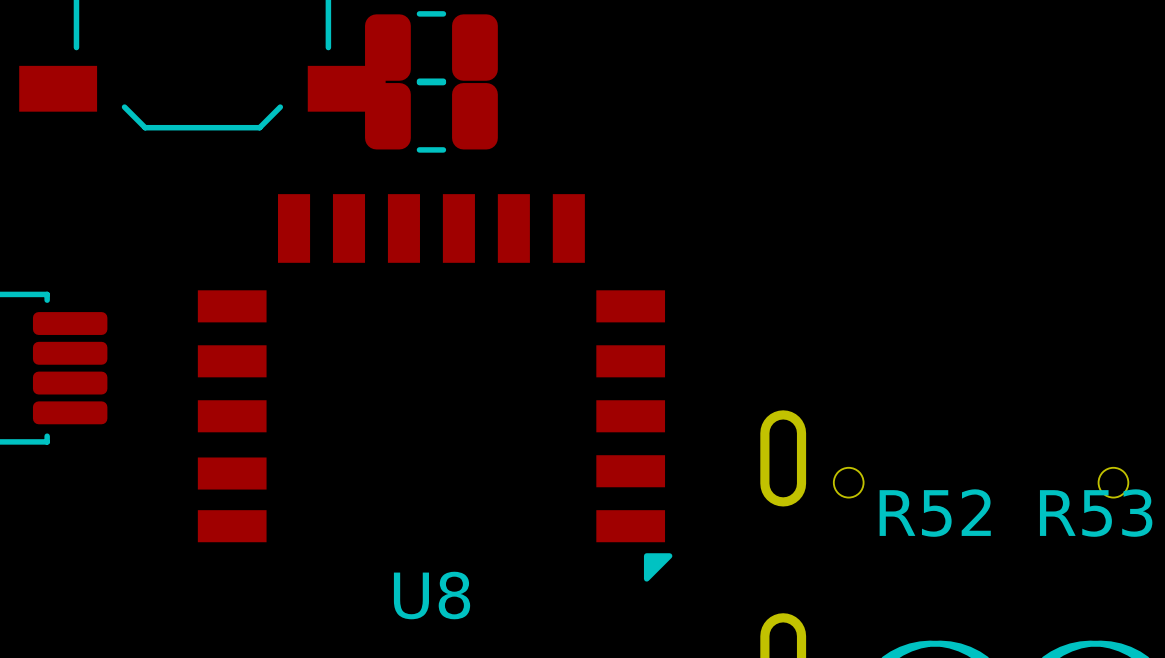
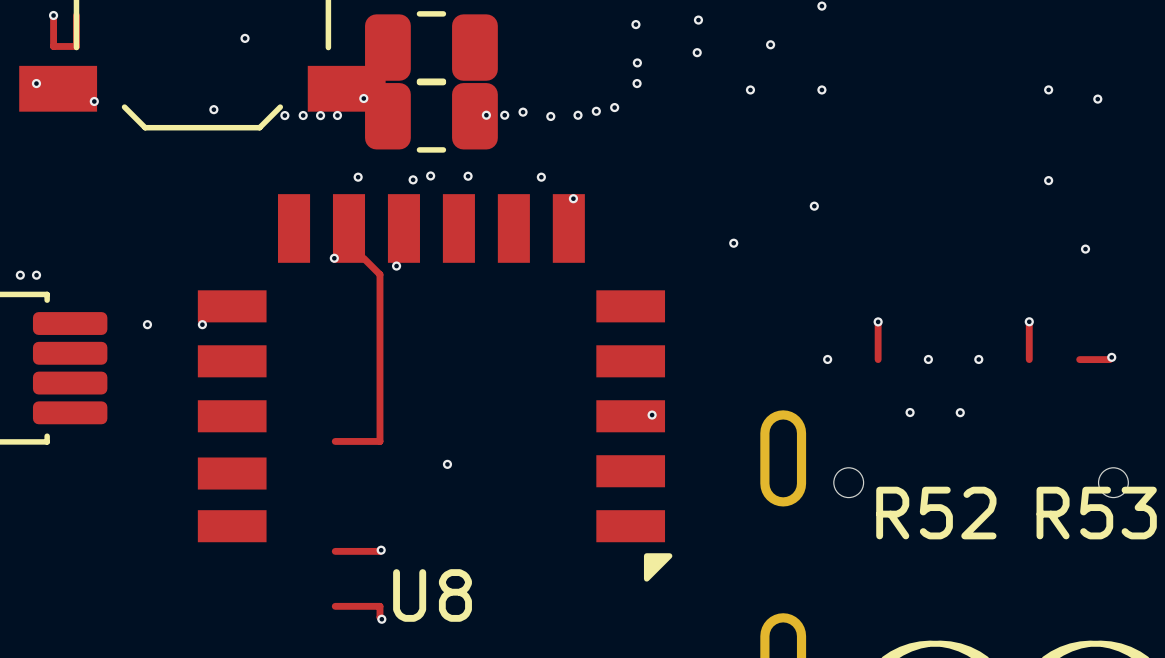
via: none -> (821, 6)
track: none -> (53, 15) (53, 46) (76, 46) (76, 15)
via: none -> (53, 15)
via: none -> (698, 20)
via: none -> (635, 24)
via: none -> (245, 38)
via: none -> (770, 44)
via: none -> (697, 52)
via: none -> (637, 62)
via: none -> (36, 83)
via: none -> (637, 83)
via: none -> (750, 89)
via: none -> (821, 89)
via: none -> (1048, 89)
via: none -> (363, 98)
via: none -> (1097, 99)
via: none -> (94, 101)
via: none -> (614, 107)
via: none -> (213, 109)
via: none -> (596, 111)
via: none -> (523, 112)
via: none -> (284, 115)
via: none -> (303, 115)
via: none -> (320, 115)
via: none -> (337, 115)
via: none -> (486, 115)
via: none -> (504, 115)
via: none -> (578, 115)
via: none -> (550, 116)
via: none -> (430, 175)
via: none -> (468, 176)
via: none -> (358, 177)
via: none -> (541, 177)
via: none -> (413, 179)
via: none -> (1048, 180)
via: none -> (573, 198)
via: none -> (814, 206)
via: none -> (733, 243)
via: none -> (1085, 249)
via: none -> (334, 258)
track: none -> (363, 258) (379, 274) (379, 441) (335, 441)
via: none -> (396, 266)
via: none -> (20, 275)
via: none -> (36, 275)
track: none -> (878, 321) (878, 359)
via: none -> (878, 321)
track: none -> (1029, 321) (1029, 359)
via: none -> (1029, 321)
via: none -> (147, 324)
via: none -> (202, 324)
track: none -> (1111, 357) (1109, 359) (1079, 359)
via: none -> (1111, 357)
via: none -> (827, 359)
via: none -> (928, 359)
via: none -> (978, 359)
via: none -> (910, 412)
via: none -> (960, 412)
via: none -> (652, 415)
via: none -> (447, 464)
track: none -> (381, 550) (335, 551)
via: none -> (381, 550)
track: none -> (335, 606) (379, 606) (379, 617) (381, 619)
via: none -> (381, 619)

